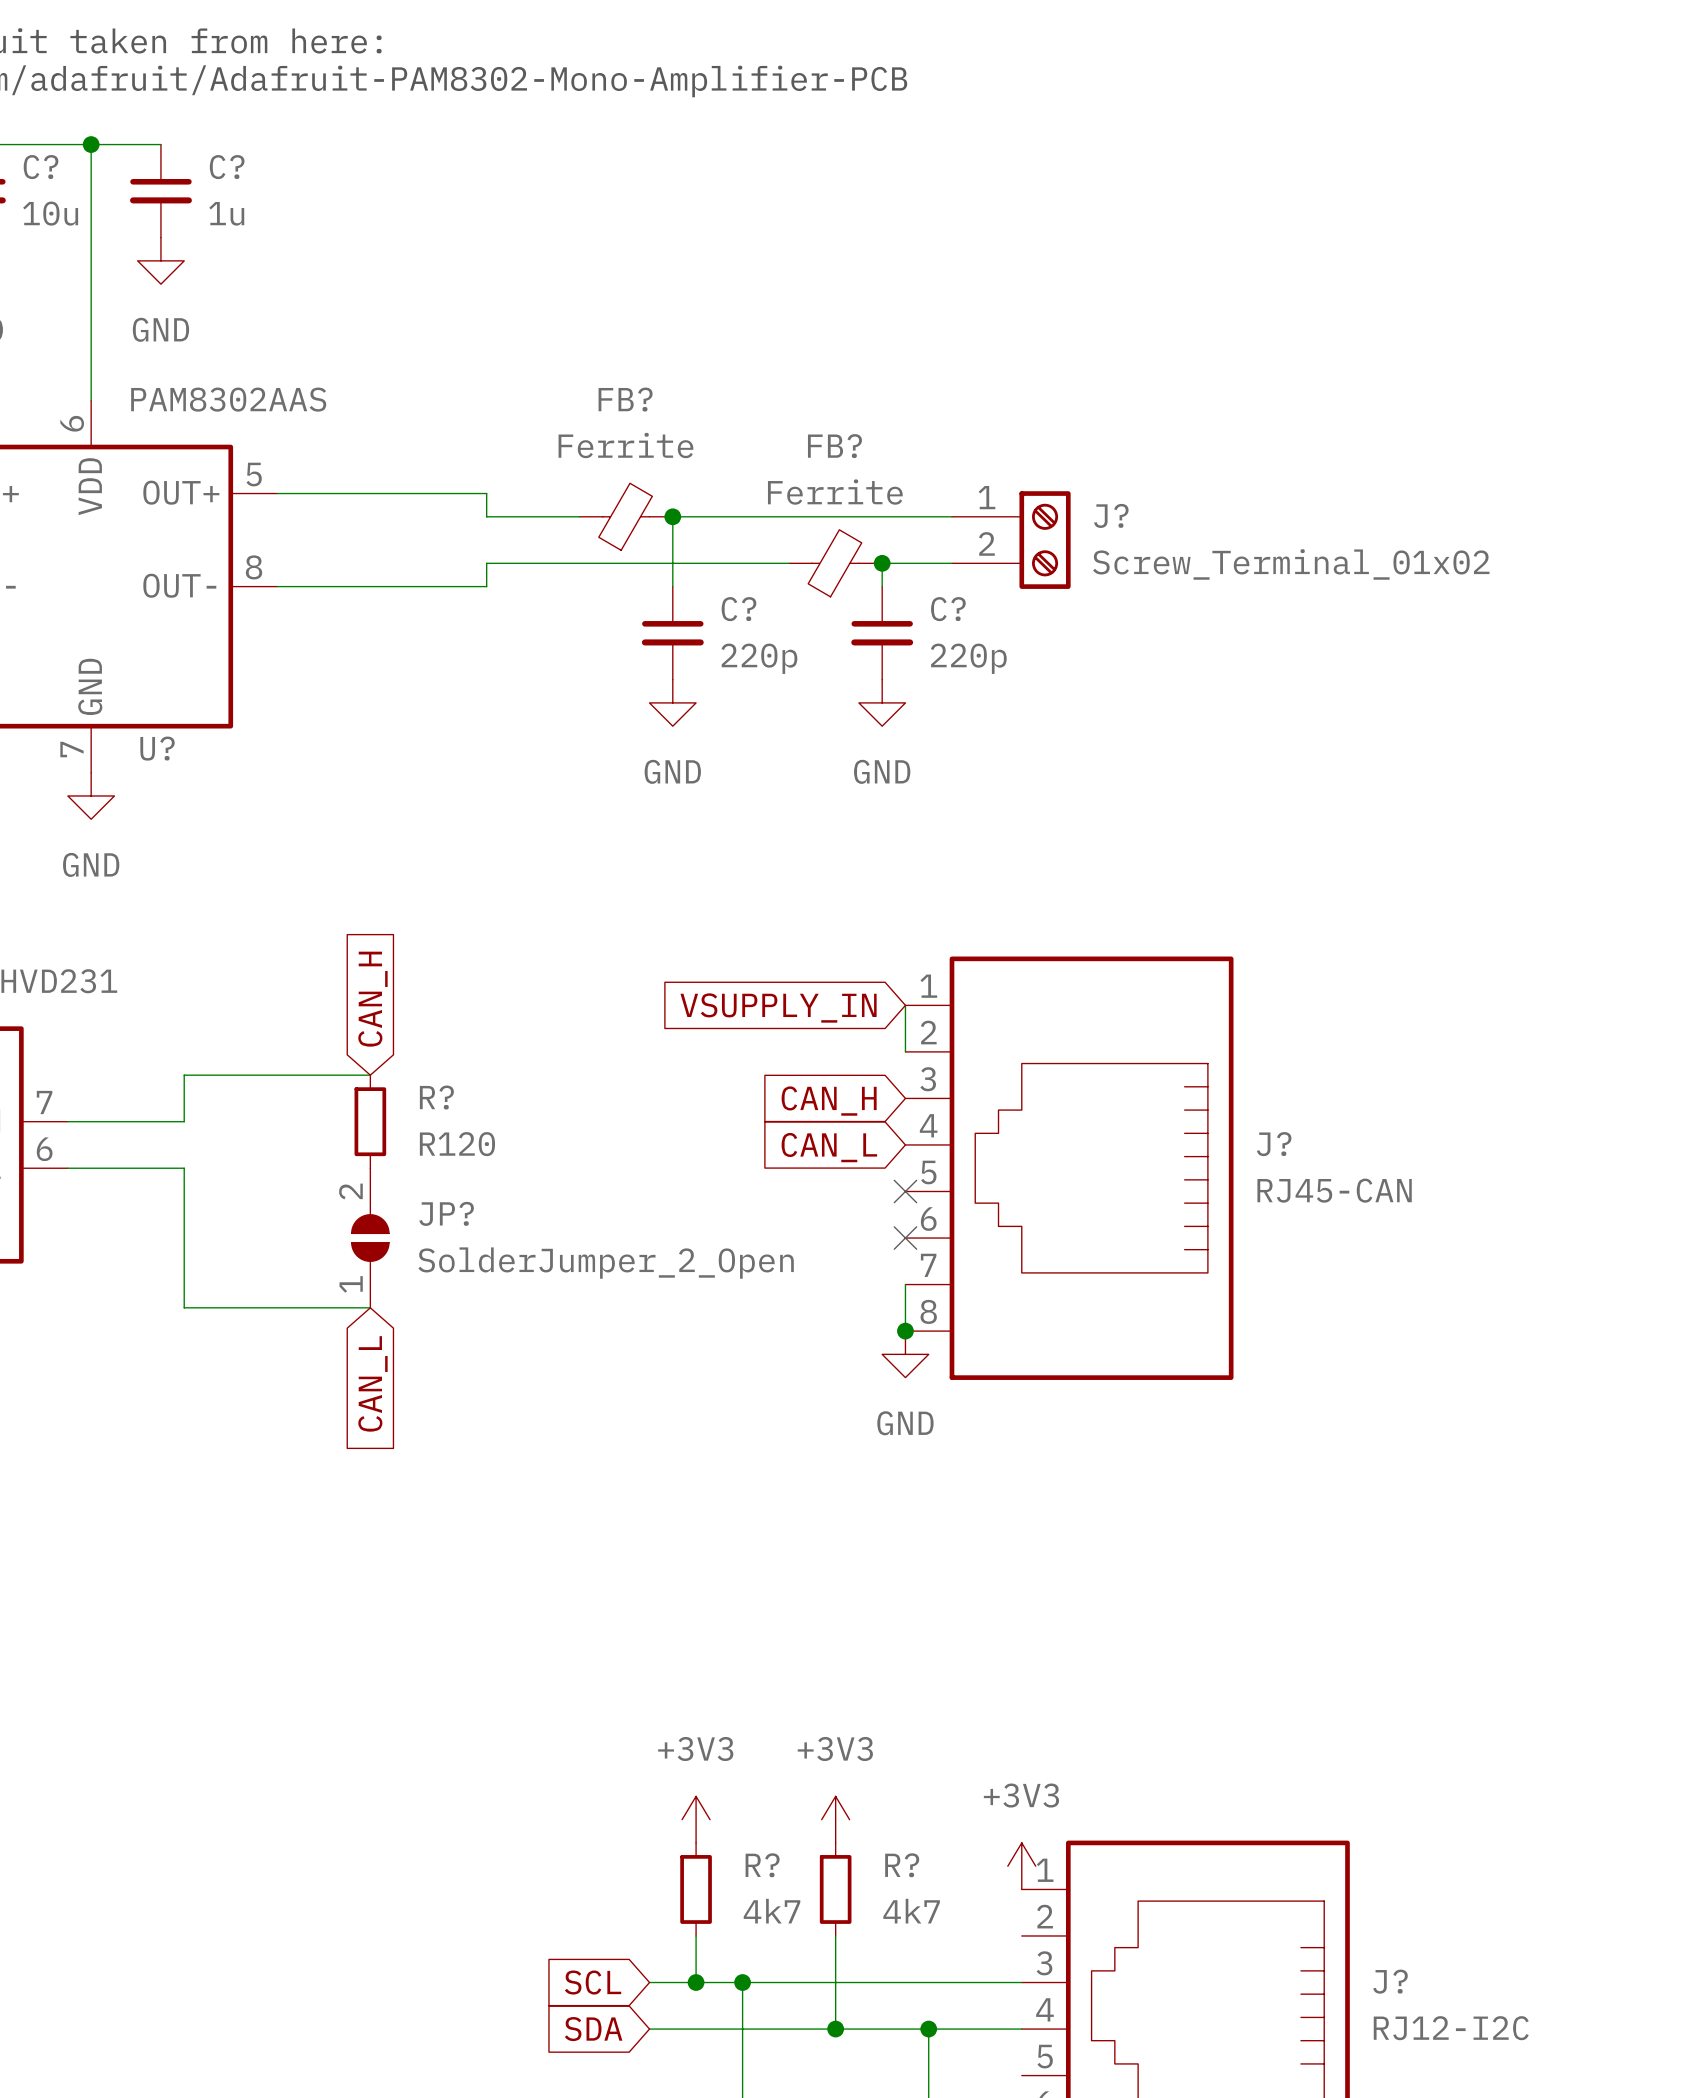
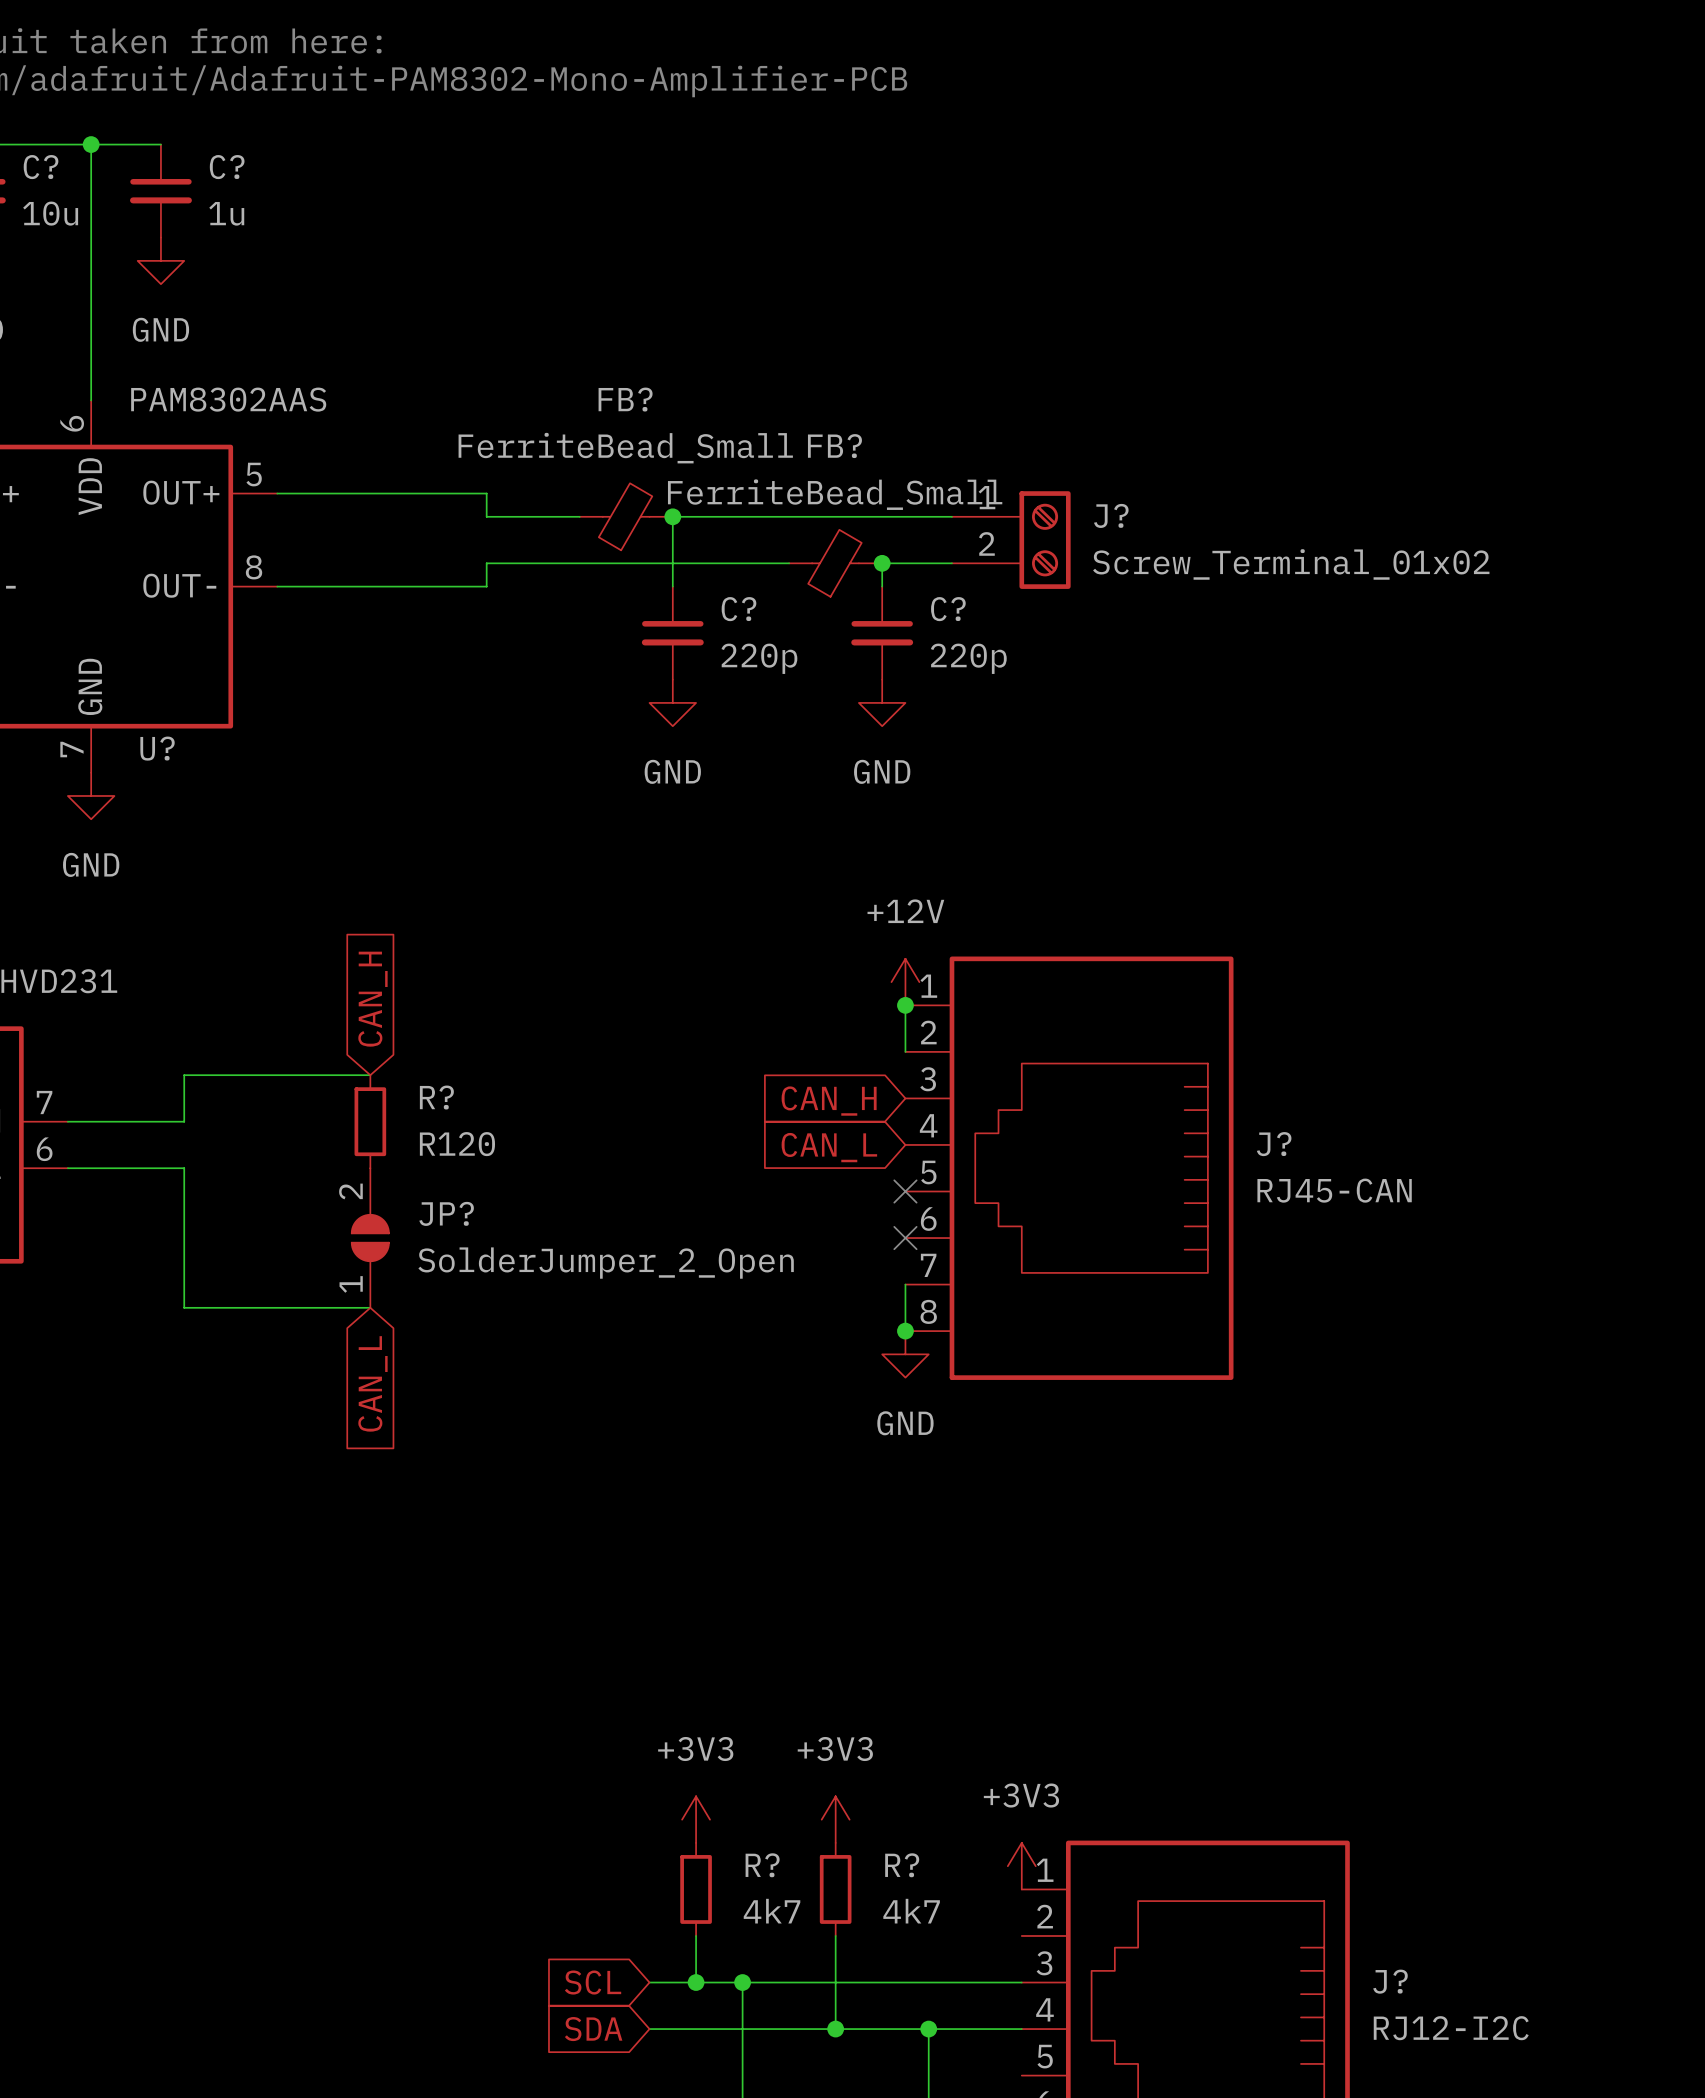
FB? value: Ferrite (625, 445) -> FerriteBead_Small (625, 448)
FB? value: Ferrite (835, 492) -> FerriteBead_Small (835, 494)
power symbol: none -> +12V (905, 982)
junction: none -> (905, 1005)
global label: VSUPPLY_IN (778, 1007) -> none

